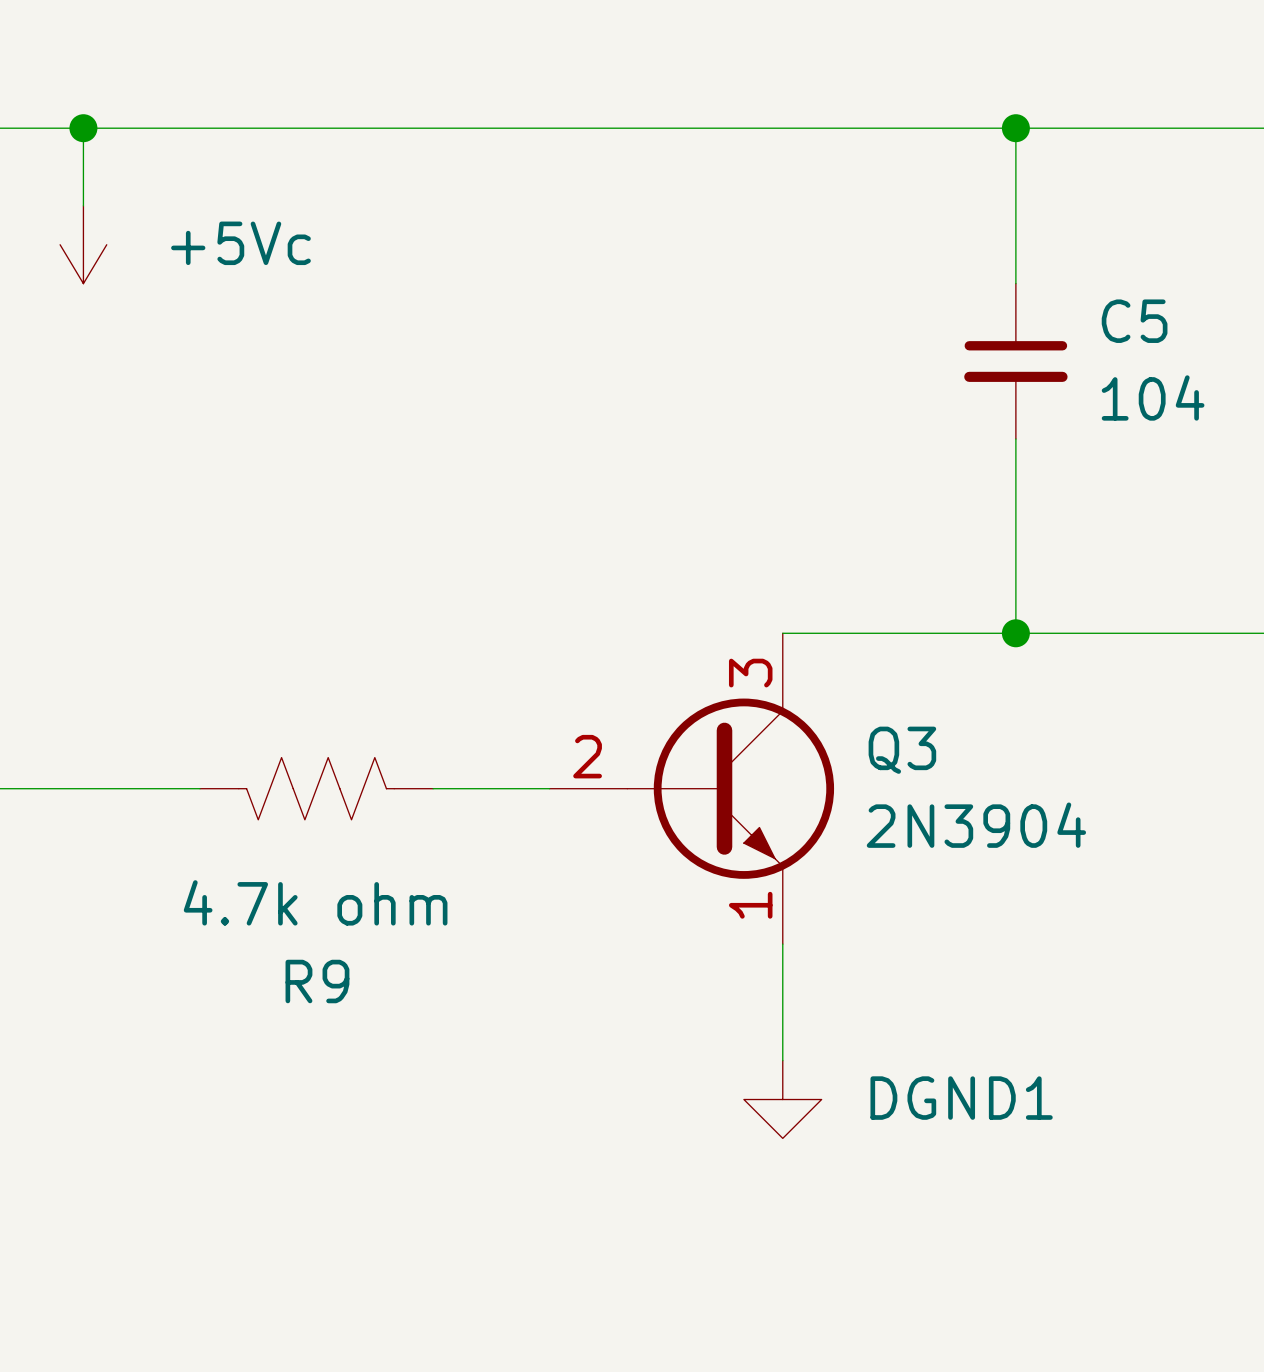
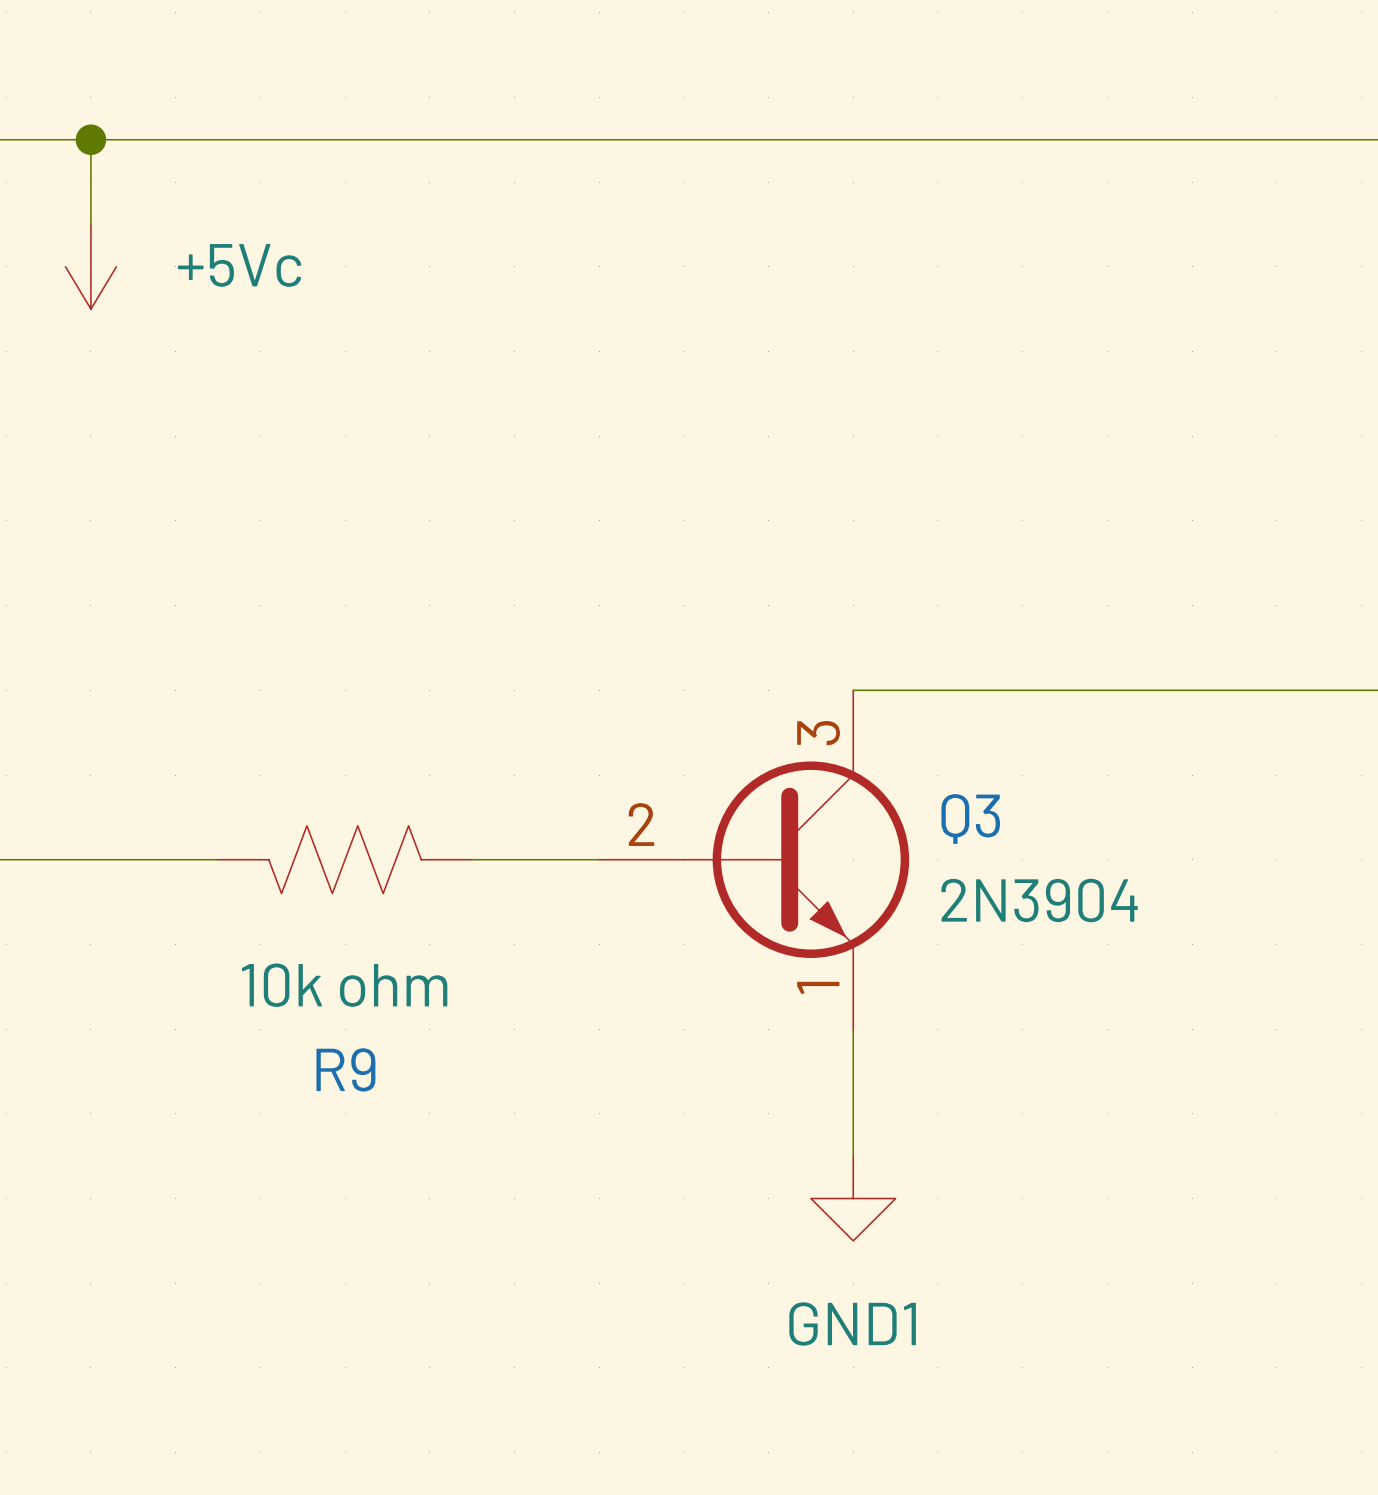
wire: (1015, 128) (1015, 283) -> none
junction: (1015, 128) -> none
C5: 104 (1015, 361) -> none
wire: (1015, 439) (1015, 633) -> none
junction: (1015, 633) -> none
R9 value: 4.7k ohm (315, 902) -> 10k ohm (344, 985)
power symbol: DGND1 (782, 1099) -> GND1 (853, 1198)

